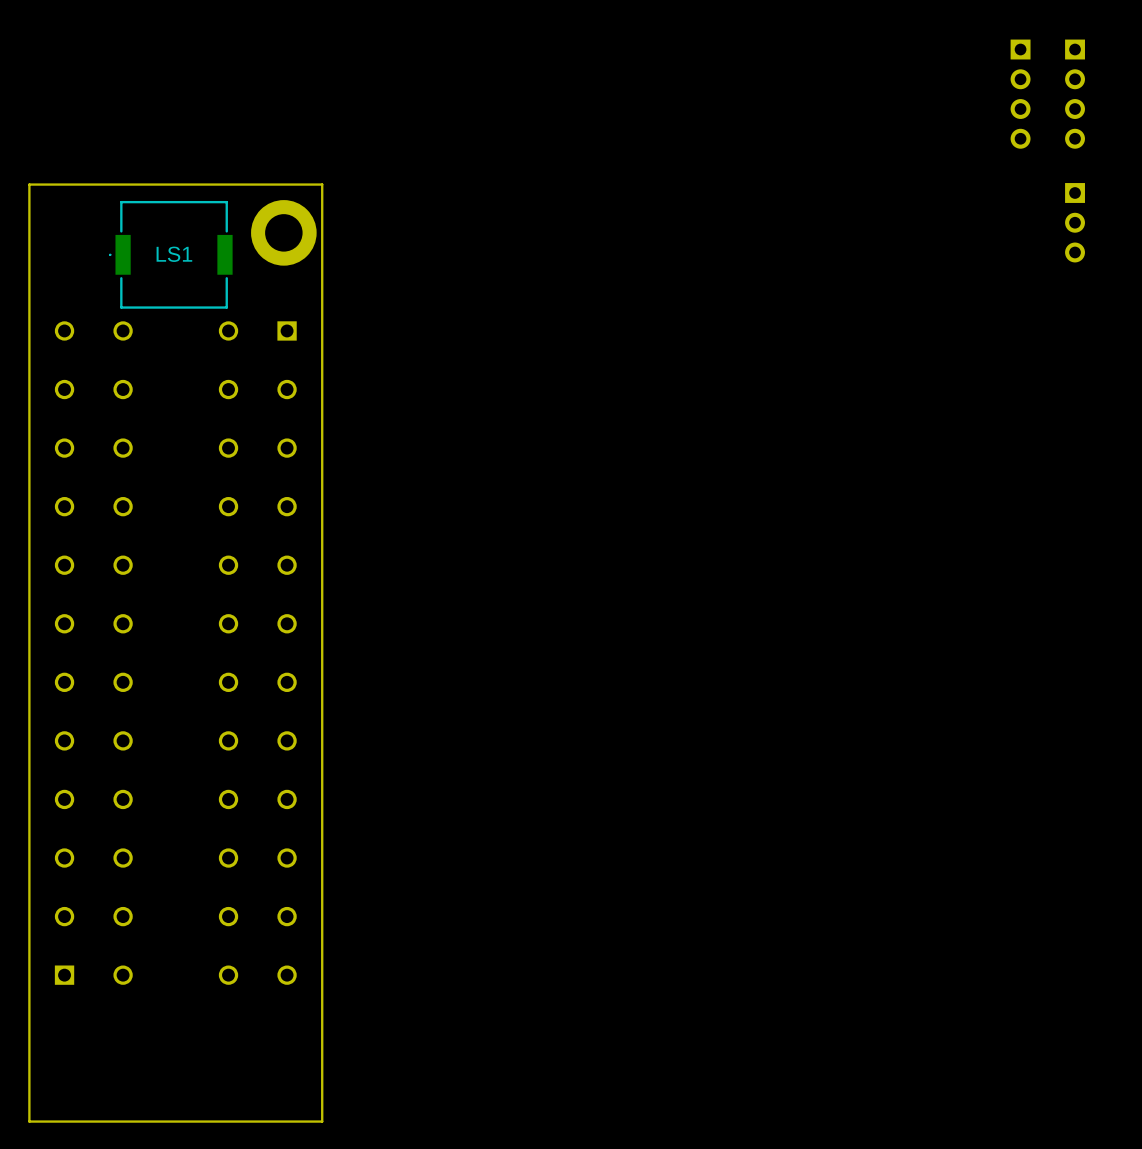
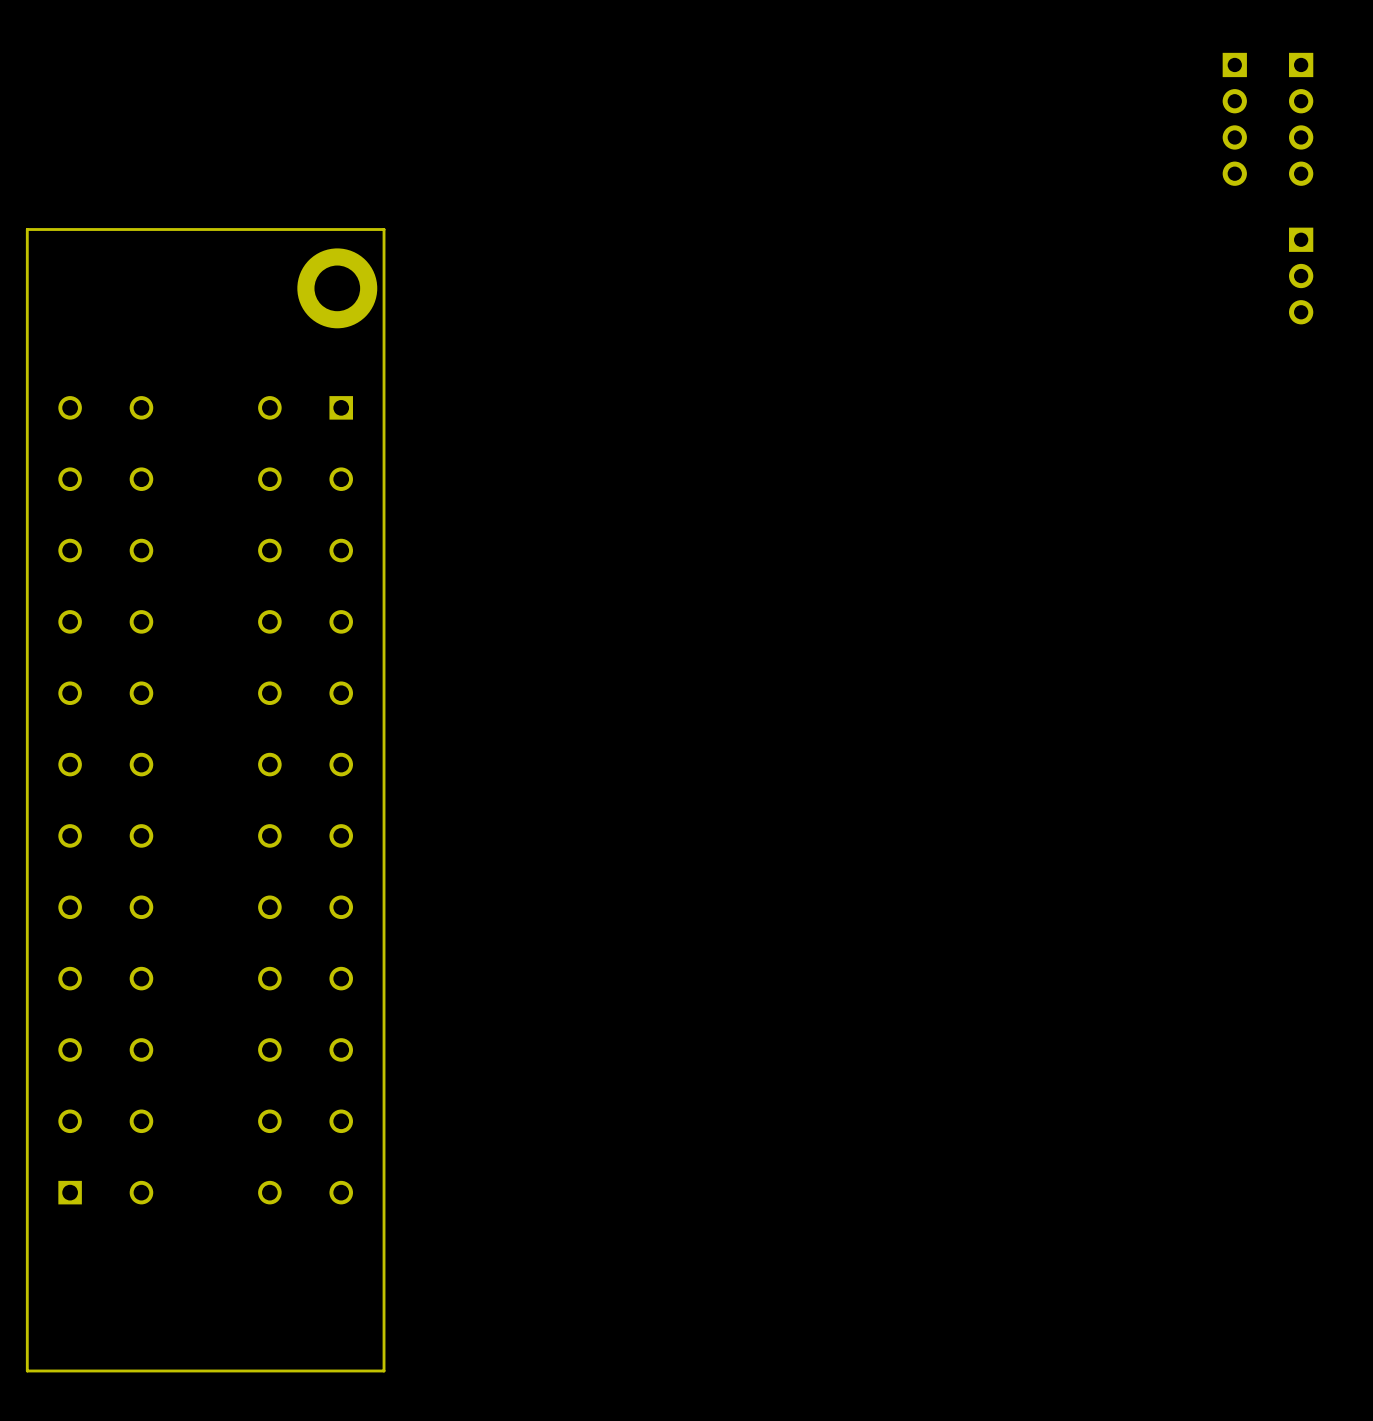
LS1: (170, 254) -> none

